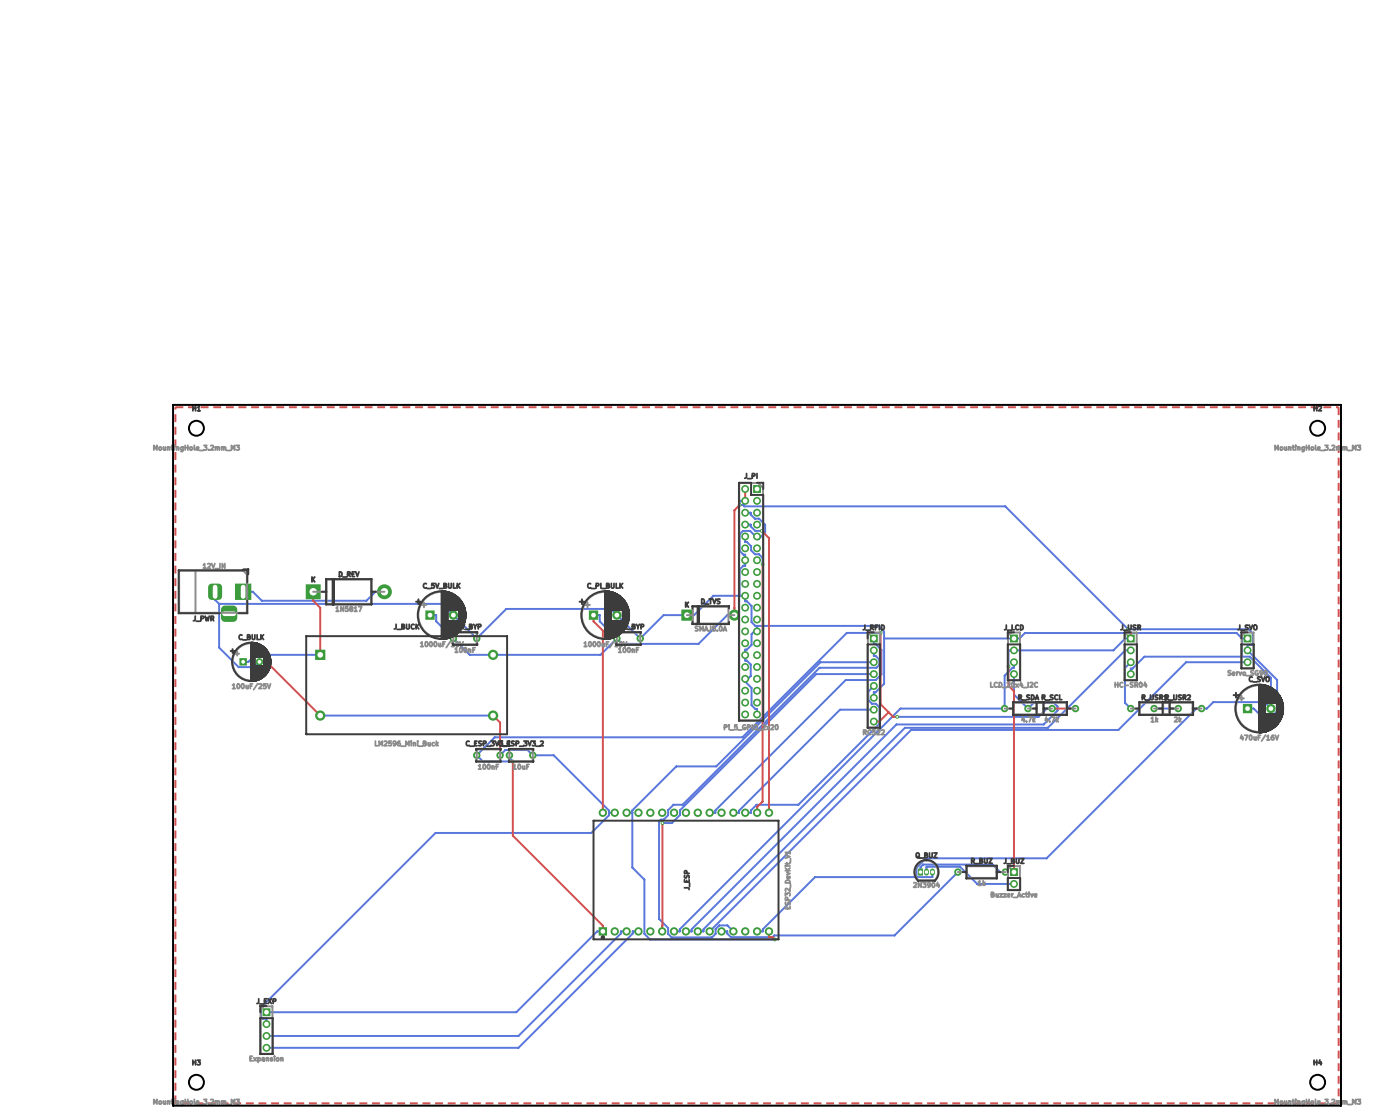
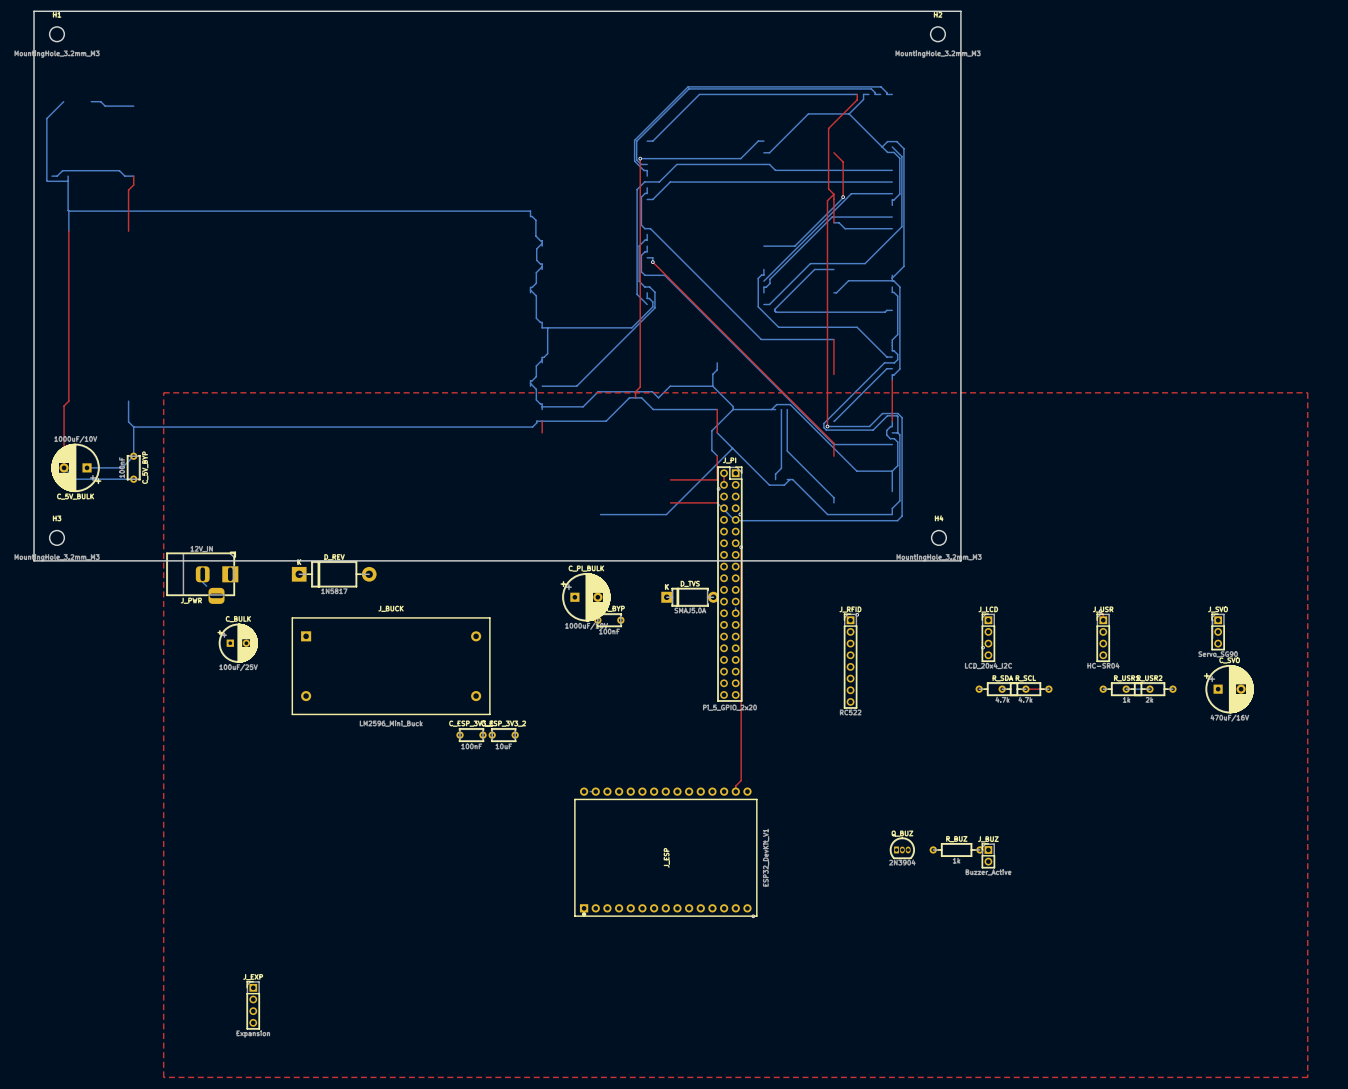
board edge: none -> (34, 11) (34, 560) (960, 560) (960, 11) (34, 11)
top track: none -> (857, 94) (857, 99) (828, 128) (828, 188) (833, 194)
bottom track: none -> (857, 94) (699, 94) (652, 141) (647, 141)
bottom track: none -> (868, 94) (863, 94) (863, 99) (849, 113)
bottom track: none -> (880, 94) (875, 94) (871, 88) (688, 88) (636, 141) (636, 159) (641, 164) (647, 164)
bottom track: none -> (892, 94) (886, 94) (881, 86) (688, 86) (634, 140) (634, 161) (644, 170) (647, 170) (647, 176)
bottom track: none -> (63, 101) (46, 118) (46, 180) (68, 181)
bottom track: none -> (91, 101) (100, 101) (105, 106) (133, 106)
bottom track: none -> (849, 113) (887, 152) (893, 152) (899, 158) (899, 194) (892, 199) (892, 205)
bottom track: none -> (849, 113) (808, 113) (769, 152) (763, 152)
bottom track: none -> (763, 141) (758, 141) (740, 158) (640, 158)
bottom track: none -> (882, 146) (887, 141) (896, 141) (903, 148) (903, 266) (892, 278)
bottom track: none -> (892, 147) (901, 156) (901, 226) (865, 263) (810, 263) (769, 304) (763, 304)
top track: none -> (833, 152) (843, 162) (843, 197)
top track: none -> (640, 158) (640, 387) (635, 391) (635, 397)
via: none -> (640, 158)
bottom track: none -> (892, 170) (775, 170) (769, 164) (676, 164) (659, 181) (644, 181) (637, 189) (637, 294) (647, 304)
bottom track: none -> (52, 176) (57, 176) (62, 170) (119, 170) (124, 176) (133, 176)
bottom track: none -> (68, 176) (68, 211)
top track: none -> (133, 176) (133, 184) (128, 190) (128, 231)
bottom track: none -> (892, 182) (670, 182) (652, 199) (647, 199)
bottom track: none -> (647, 187) (647, 193) (641, 197) (641, 225) (644, 228) (650, 228) (761, 339) (833, 339)
bottom track: none -> (892, 193) (851, 193) (763, 281)
top track: none -> (833, 194) (833, 222)
top track: none -> (833, 194) (827, 200) (827, 426)
bottom track: none -> (843, 197) (794, 246) (763, 246)
via: none -> (843, 197)
bottom track: none -> (68, 211) (530, 211) (530, 216) (535, 220) (535, 236) (542, 240) (542, 246)
bottom track: none -> (68, 211) (68, 231)
bottom track: none -> (892, 217) (832, 217) (769, 279) (769, 283) (763, 287) (763, 292)
bottom track: none -> (833, 222) (839, 222) (845, 228) (892, 228)
top track: none -> (68, 231) (68, 401) (64, 405) (64, 467)
bottom track: none -> (647, 234) (647, 240) (639, 246) (639, 281) (654, 292) (654, 308) (576, 386) (542, 386)
bottom track: none -> (542, 243) (536, 248) (536, 260) (542, 264) (542, 269)
bottom track: none -> (647, 246) (647, 251) (641, 255) (641, 271) (644, 275) (664, 275) (833, 444) (892, 444)
bottom track: none -> (647, 257) (652, 257) (652, 262)
top track: none -> (652, 262) (833, 443) (833, 456)
via: none -> (652, 262)
bottom track: none -> (542, 266) (536, 272) (536, 283) (530, 287) (530, 292)
bottom track: none -> (763, 269) (763, 275) (758, 278) (758, 306) (778, 327) (857, 327) (886, 357) (892, 357)
bottom track: none -> (833, 269) (814, 269) (774, 310) (885, 312) (892, 310)
bottom track: none -> (892, 275) (892, 280)
bottom track: none -> (892, 287) (892, 292) (897, 296) (897, 334) (892, 339) (892, 350) (897, 354) (897, 359) (894, 362) (884, 362) (823, 423) (823, 427) (826, 430) (873, 430) (887, 415) (897, 415) (897, 432)
bottom track: none -> (530, 290) (536, 295) (536, 318) (542, 322) (542, 327) (631, 327) (652, 306) (652, 301) (647, 298) (647, 292)
bottom track: none -> (833, 292) (836, 292) (848, 280) (893, 280) (899, 286) (899, 369) (892, 375) (892, 380)
bottom track: none -> (547, 327) (547, 353) (542, 357) (542, 362)
top track: none -> (833, 339) (833, 374)
bottom track: none -> (542, 360) (536, 365) (536, 376) (530, 380) (530, 386)
bottom track: none -> (717, 362) (717, 369) (712, 374) (712, 386)
bottom track: none -> (892, 368) (886, 368) (833, 421)
top track: none -> (892, 380) (892, 421)
bottom track: none -> (530, 383) (536, 389) (536, 399) (542, 404) (542, 409)
bottom track: none -> (712, 386) (670, 386) (658, 397) (652, 391) (598, 391) (583, 406) (542, 406)
bottom track: none -> (712, 386) (733, 406) (733, 409)
board edge: (173, 404) (173, 1105) (1340, 1105) (1340, 404) (173, 404) -> none
bottom track: none -> (128, 401) (128, 421) (133, 427)
top track: none -> (717, 409) (717, 432)
bottom track: none -> (717, 409) (653, 409) (641, 397) (629, 397) (606, 421) (536, 421) (532, 427) (133, 427)
bottom track: none -> (733, 409) (775, 409)
bottom track: none -> (733, 409) (711, 430) (711, 450) (717, 455)
bottom track: none -> (771, 409) (776, 404) (790, 404) (856, 471) (892, 471)
bottom track: none -> (781, 409) (781, 468) (775, 474) (775, 479)
bottom track: none -> (787, 409) (787, 451) (833, 497) (833, 502)
part position: (196, 428) -> (56, 34)
part position: (1317, 428) -> (937, 34)
top track: none -> (542, 421) (542, 432)
bottom track: none -> (892, 421) (892, 426) (886, 430) (886, 435) (897, 442) (897, 465) (892, 471)
bottom track: none -> (827, 426) (869, 426) (882, 413) (897, 413) (902, 417) (902, 516) (897, 520) (735, 520) (717, 502)
via: none -> (827, 426)
bottom track: none -> (133, 427) (133, 456) (122, 467) (87, 467)
bottom track: none -> (717, 432) (732, 448)
bottom track: none -> (892, 432) (897, 432)
bottom track: none -> (897, 432) (899, 434) (899, 500) (892, 508) (892, 514) (827, 514) (792, 479) (787, 479)
bottom track: none -> (732, 448) (666, 514) (600, 514)
bottom track: none -> (732, 448) (769, 485) (784, 485) (789, 479)
top track: none -> (717, 455) (717, 479) (670, 479)
bottom track: none -> (64, 467) (75, 479) (133, 479)
bottom track: none -> (892, 471) (892, 491)
bottom track: (745, 500) (739, 500) (739, 504) (1005, 506) (1128, 629) (1248, 629) (1253, 633) (1253, 643) (1247, 644) (1247, 650) (1277, 679) (1277, 711) (1273, 714) (1259, 714) (1253, 708) (1247, 708) -> none
top track: (739, 504) (734, 510) (734, 615) -> none
bottom track: (745, 512) (750, 512) (754, 518) (759, 518) (765, 524) (765, 532) (758, 539) (757, 536) -> none
top track: none -> (670, 502) (717, 502)
bottom track: (745, 524) (750, 524) (755, 530) (761, 530) -> none
top track: (761, 530) (768, 538) (768, 812) -> none
bottom track: (745, 536) (745, 541) (751, 546) (751, 550) (762, 557) (762, 564) -> none
bottom track: (757, 537) (750, 530) (742, 530) (739, 534) (739, 550) (745, 554) (745, 565) (739, 569) (739, 595) -> none
bottom track: (243, 591) (252, 591) (261, 600) (366, 600) (375, 591) (384, 591) -> none
top track: (313, 591) (313, 600) (320, 607) (320, 654) -> none
bottom track: (430, 615) (436, 615) (436, 621) (469, 654) (600, 654) (616, 638) -> none
part rotation: 0° (440, 615) -> 180° (76, 467)
part position: (440, 615) -> (76, 467)
top track: (593, 615) (593, 621) (602, 630) (602, 812) -> none
bottom track: (593, 615) (599, 615) (599, 621) (622, 643) (698, 643) (727, 615) (734, 615) -> none
bottom track: (757, 628) (751, 634) (751, 644) (745, 649) (745, 660) (750, 664) (750, 676) (745, 681) -> none
top track: (880, 632) (880, 704) (893, 716) (897, 716) -> none
bottom track: (880, 632) (846, 632) (742, 737) (494, 737) (476, 755) (482, 761) (512, 761) (509, 755) -> none
part rotation: 0° (465, 638) -> 90° clockwise (133, 467)
part position: (465, 638) -> (133, 467)
bottom track: (873, 638) (873, 643) (881, 649) (881, 674) (875, 680) (845, 680) (715, 810) (715, 812) (709, 812) -> none
bottom track: (884, 638) (1019, 638) (1024, 633) (1236, 633) (1242, 638) -> none
bottom track: (1130, 638) (1125, 638) (1113, 650) (1008, 650) (1008, 666) -> none
bottom track: (873, 650) (873, 655) (879, 659) (879, 664) (876, 667) (819, 667) (682, 804) (673, 804) (668, 810) (668, 815) (659, 821) (659, 918) (668, 927) (668, 933) (671, 937) (712, 937) (719, 925) (727, 925) (733, 931) -> none
bottom track: (1130, 650) (1125, 650) (1047, 727) (904, 727) (703, 929) (703, 931) (697, 931) -> none
bottom track: (320, 654) (255, 654) (248, 661) (243, 661) -> none
top track: (259, 661) (266, 661) (320, 715) -> none
bottom track: (259, 661) (254, 667) (238, 667) (219, 647) (219, 603) (442, 603) (476, 638) (506, 608) (610, 608) (640, 638) (663, 615) (694, 615) (713, 595) (745, 595) (745, 601) (751, 605) (751, 622) (755, 625) (878, 625) (884, 631) (884, 683) (873, 692) (873, 697) -> none
bottom track: (873, 662) (820, 662) (716, 766) (676, 766) (632, 810) (632, 867) (644, 879) (644, 933) (650, 939) (774, 939) -> none
bottom track: (1013, 662) (1013, 667) (1004, 675) (1004, 708) (900, 708) (679, 929) (679, 931) (674, 931) -> none
bottom track: (1130, 662) (1124, 668) (1124, 702) (1130, 708) -> none
bottom track: (1247, 662) (1186, 662) (1118, 729) (911, 729) (709, 931) -> none
top track: (1008, 666) (1008, 685) (1013, 691) (1013, 872) -> none
bottom track: (873, 674) (816, 674) (679, 810) (679, 814) (671, 823) (662, 823) -> none
bottom track: (1013, 674) (1013, 694) (1027, 708) (1033, 703) (1054, 703) (1057, 706) (1057, 710) (1043, 724) (896, 724) (691, 929) (691, 931) (685, 931) -> none
bottom track: (1130, 674) (1130, 668) (1144, 656) (1249, 656) (1270, 677) (1270, 708) (1264, 702) (1213, 702) (1206, 708) (1196, 708) (1046, 858) (925, 858) (916, 867) (916, 877) -> none
bottom track: (745, 681) (751, 687) (751, 705) (757, 708) (757, 714) -> none
bottom track: (873, 685) (868, 691) (868, 700) (879, 707) (879, 723) (798, 804) (756, 804) (750, 812) (745, 812) -> none
bottom track: (1052, 708) (1046, 708) (1038, 716) (897, 716) -> none
bottom track: (873, 709) (840, 709) (739, 810) (739, 812) (733, 812) -> none
top track: (888, 712) (879, 721) (873, 721) -> none
bottom track: (320, 715) (493, 715) -> none
top track: (493, 715) (500, 722) (500, 755) -> none
via: (897, 716) -> none
bottom track: (500, 755) (505, 750) (527, 750) (532, 755) (553, 755) (609, 810) (609, 815) (591, 832) (435, 832) (261, 1007) (261, 1016) (266, 1018) (266, 1024) -> none
top track: (512, 761) (512, 835) (602, 925) (602, 931) -> none
top track: (662, 823) (662, 931) -> none
via: (662, 823) -> none
bottom track: (920, 872) (920, 867) (923, 864) (992, 864) (1000, 872) (1005, 872) -> none
bottom track: (926, 872) (926, 866) (960, 866) (977, 883) (1013, 883) -> none
bottom track: (932, 872) (932, 877) (815, 877) (762, 931) (757, 931) -> none
bottom track: (957, 872) (894, 935) (730, 937) (727, 931) (721, 931) -> none
bottom track: (602, 931) (597, 931) (516, 1012) (266, 1012) -> none
bottom track: (626, 931) (620, 931) (620, 933) (518, 1035) (266, 1035) -> none
bottom track: (638, 931) (632, 931) (632, 933) (518, 1047) (266, 1047) -> none
top track: (768, 931) (768, 937) (774, 939) -> none
part position: (196, 1082) -> (56, 537)
part position: (1317, 1082) -> (938, 537)

